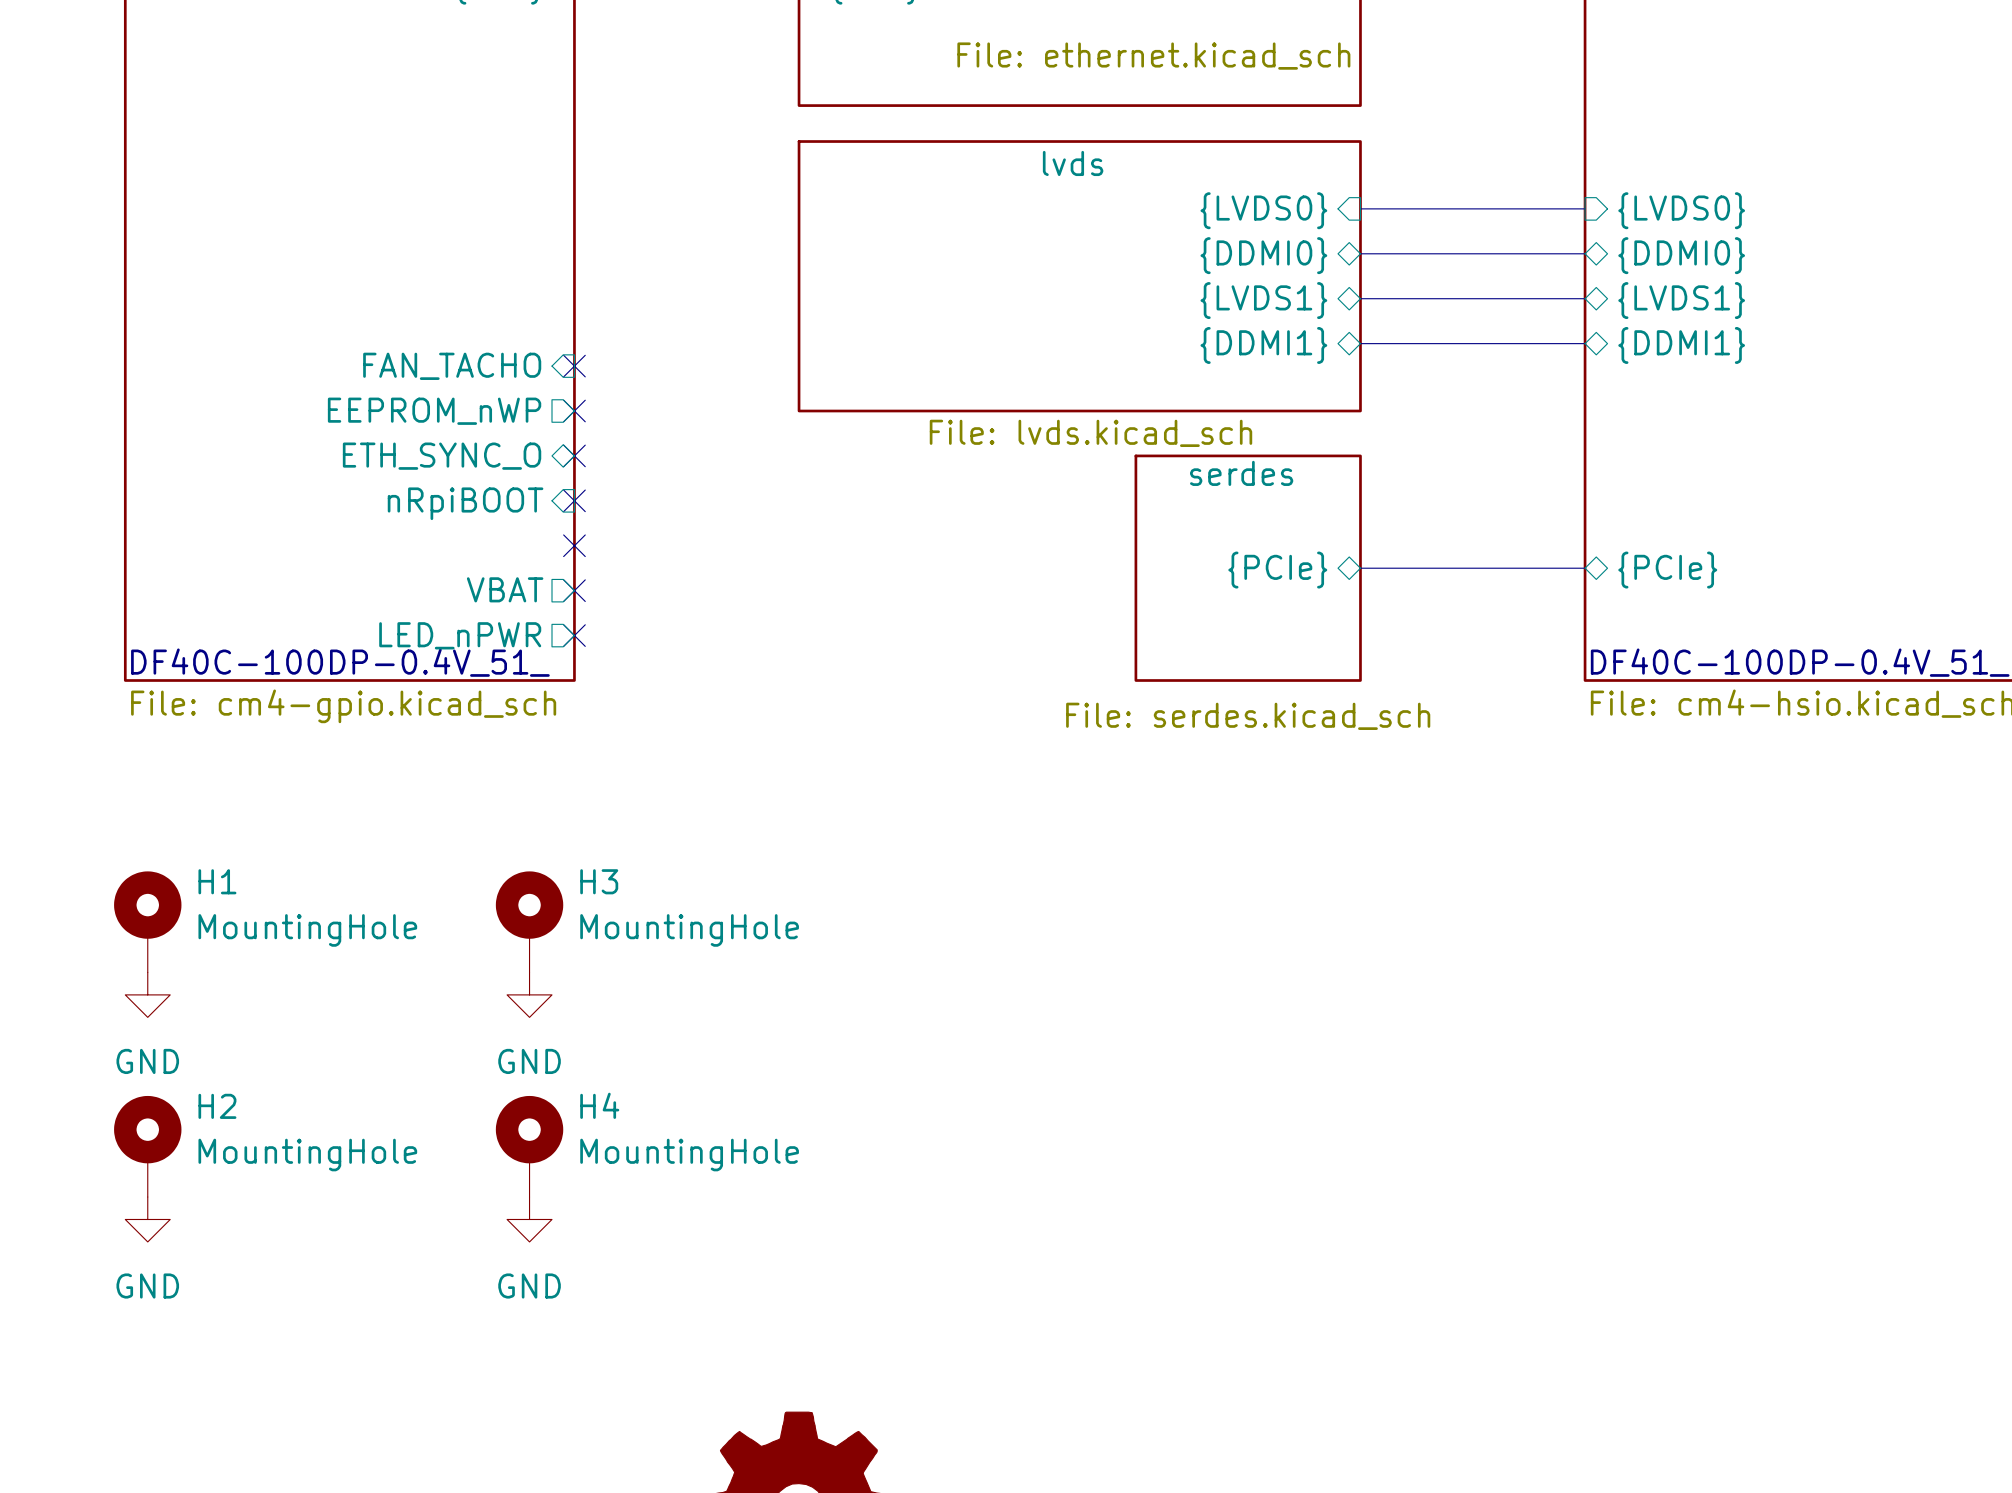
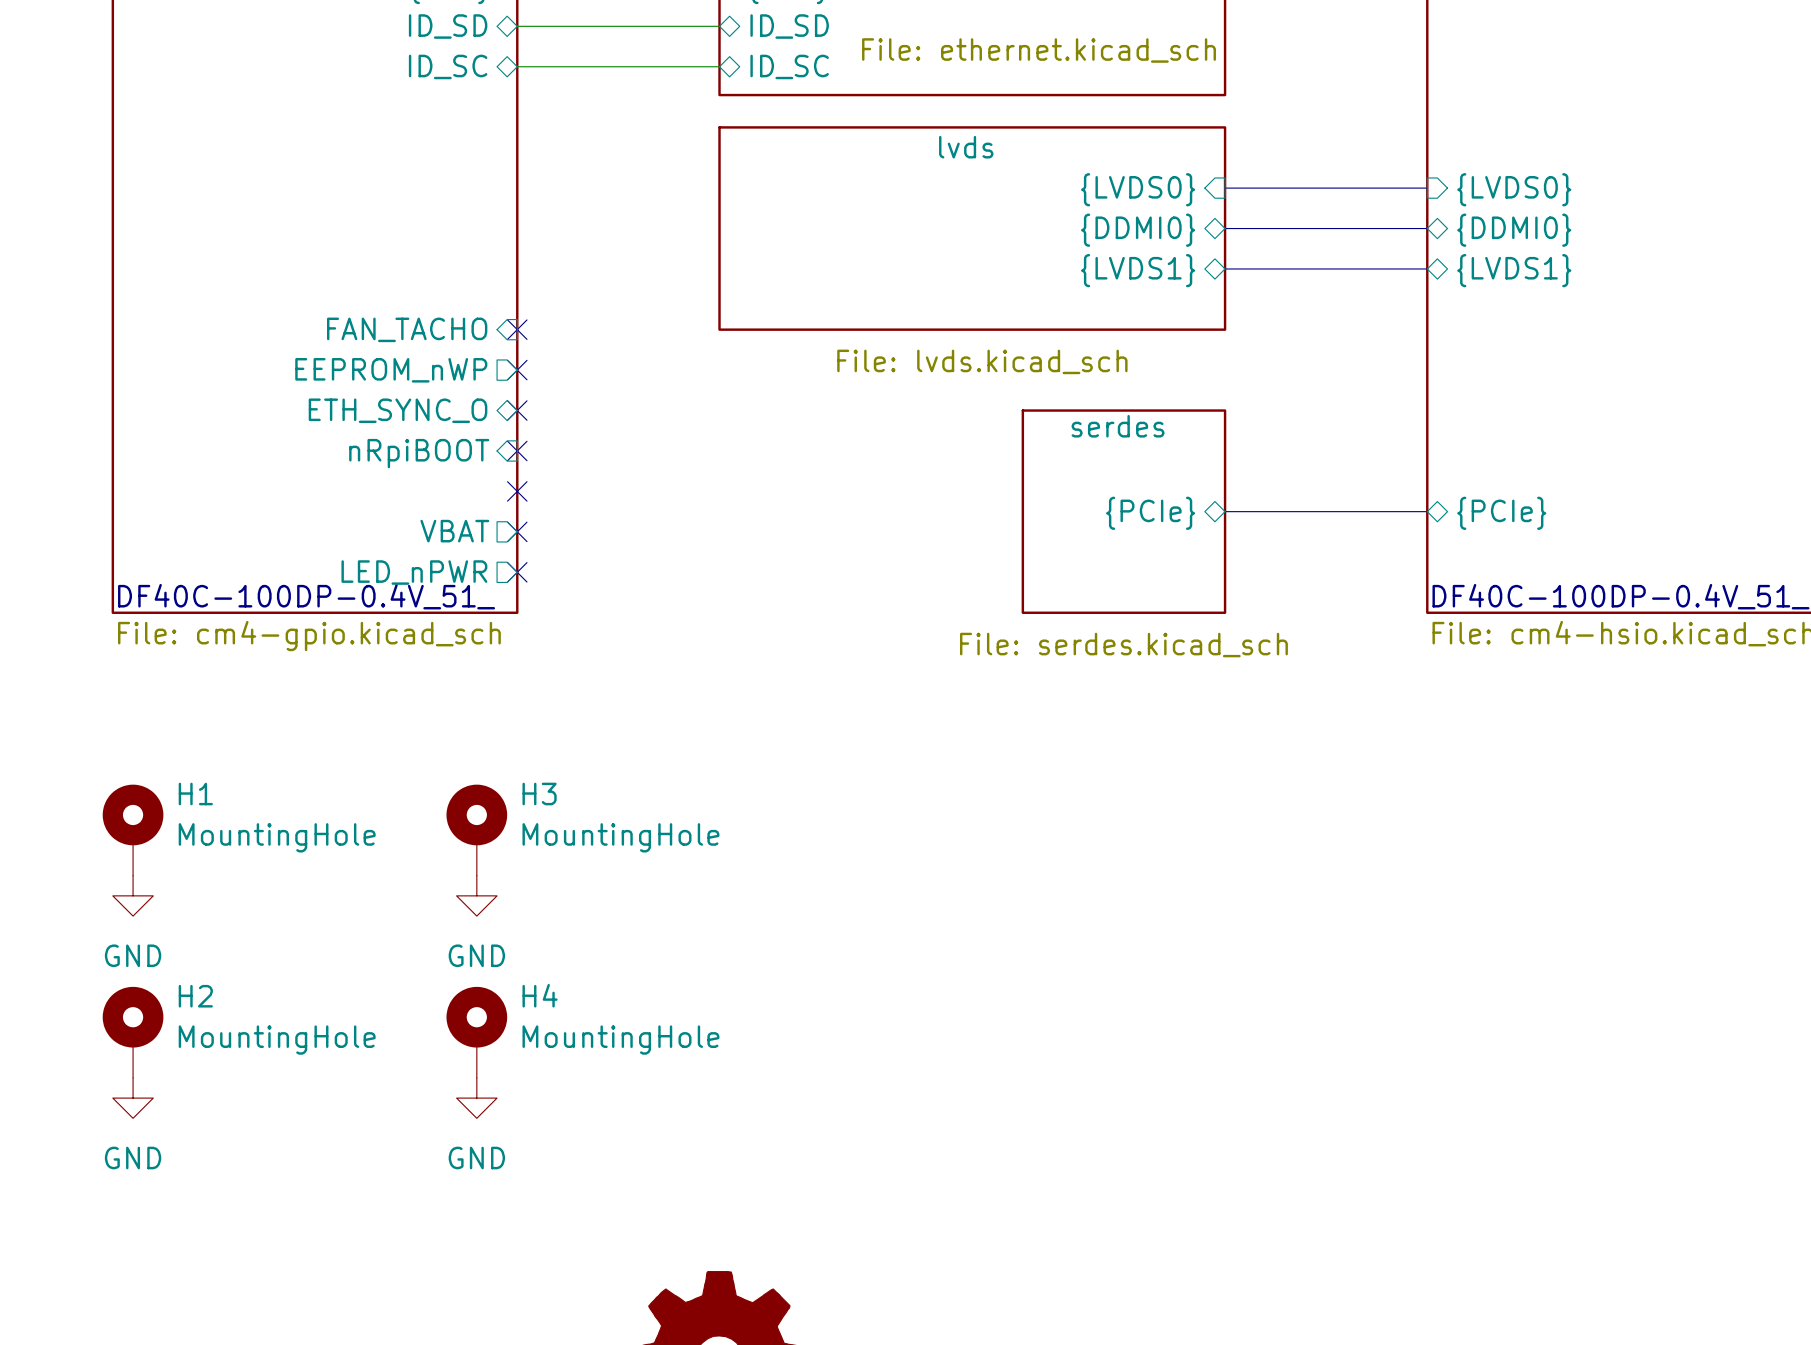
sheet pin: none -> ID_SD (448, 26)
wire: none -> (517, 26) (719, 26)
sheet pin: none -> ID_SD (789, 26)
sheet pin: none -> ID_SC (448, 66)
wire: none -> (517, 66) (719, 66)
sheet pin: none -> ID_SC (789, 66)
sheet lvds: none -> File: lvds.kicad_sch (972, 228)
sheet lvds: File: lvds.kicad_sch (1079, 276) -> none
bus: (1360, 343) (1585, 343) -> none
sheet pin: {DDMI1} (1263, 345) -> none
sheet pin: {DDMI1} (1681, 345) -> none

